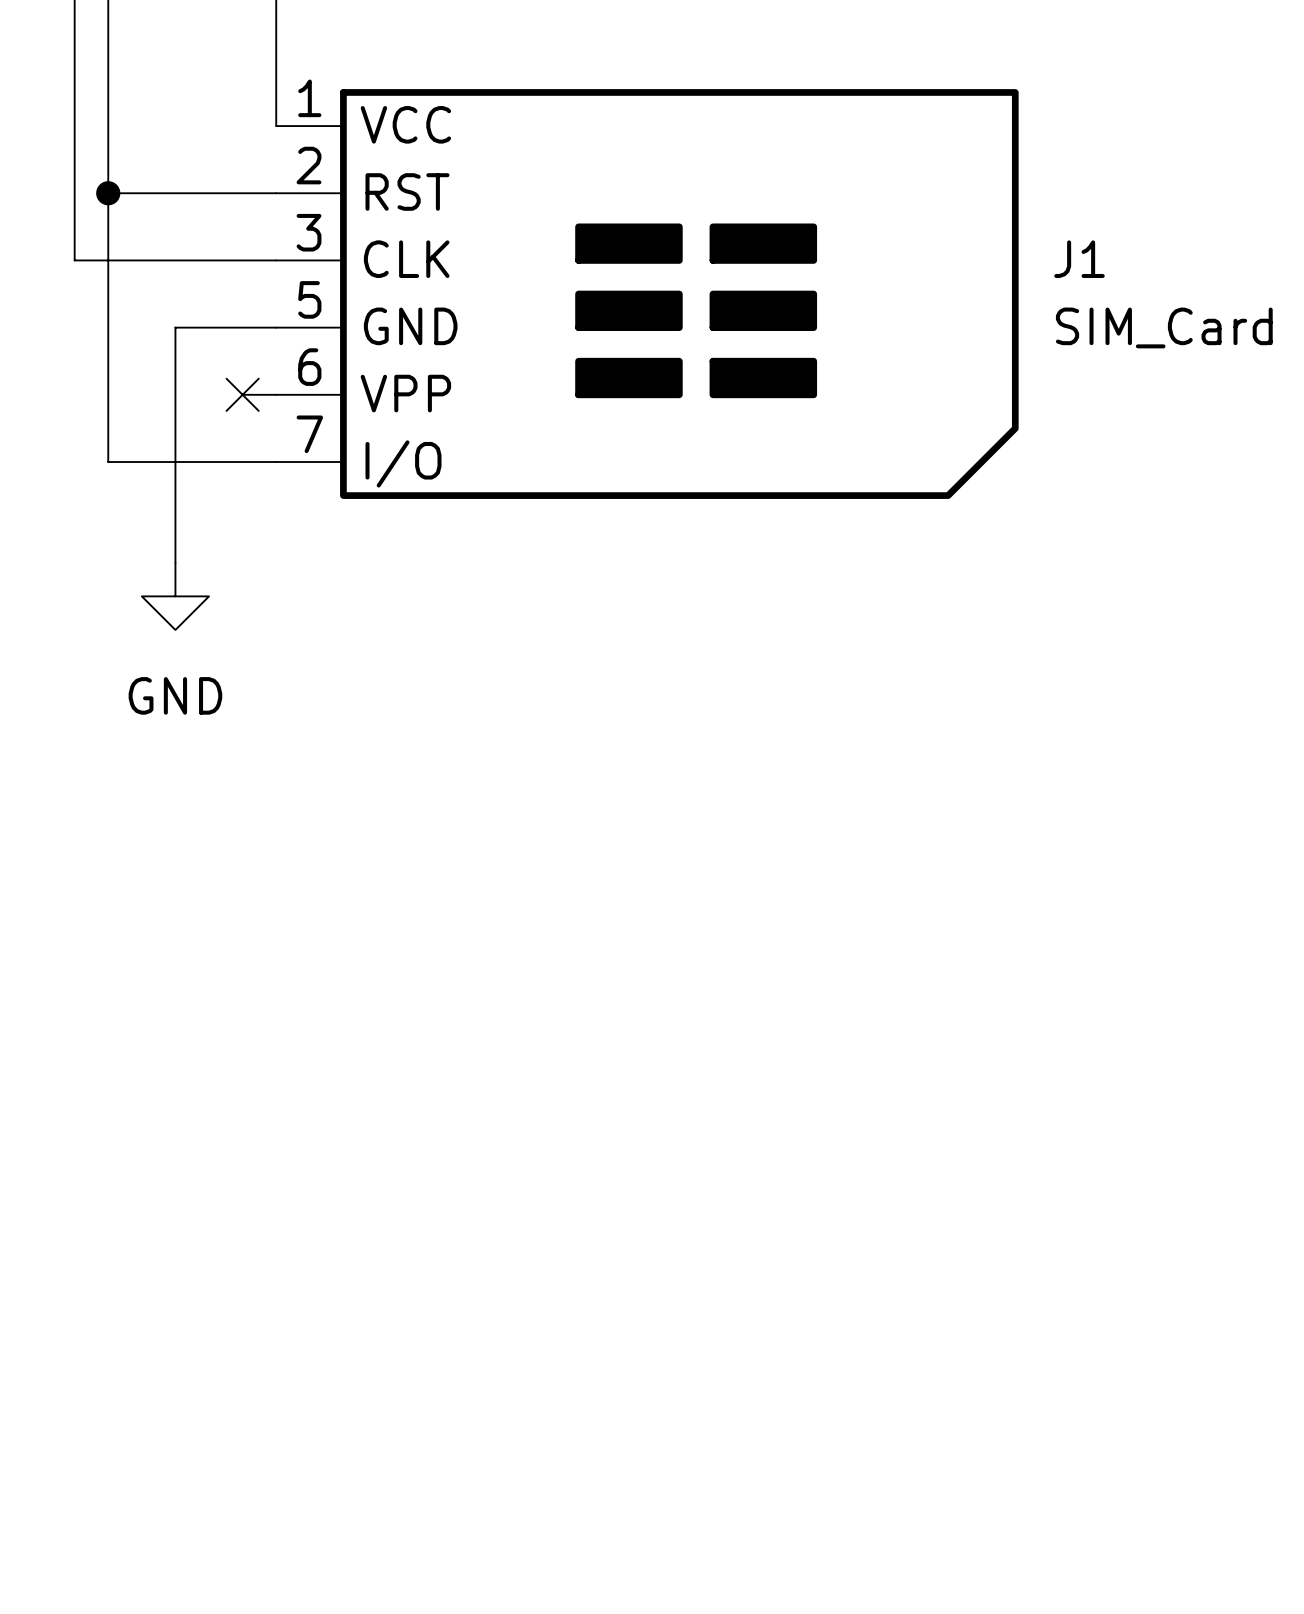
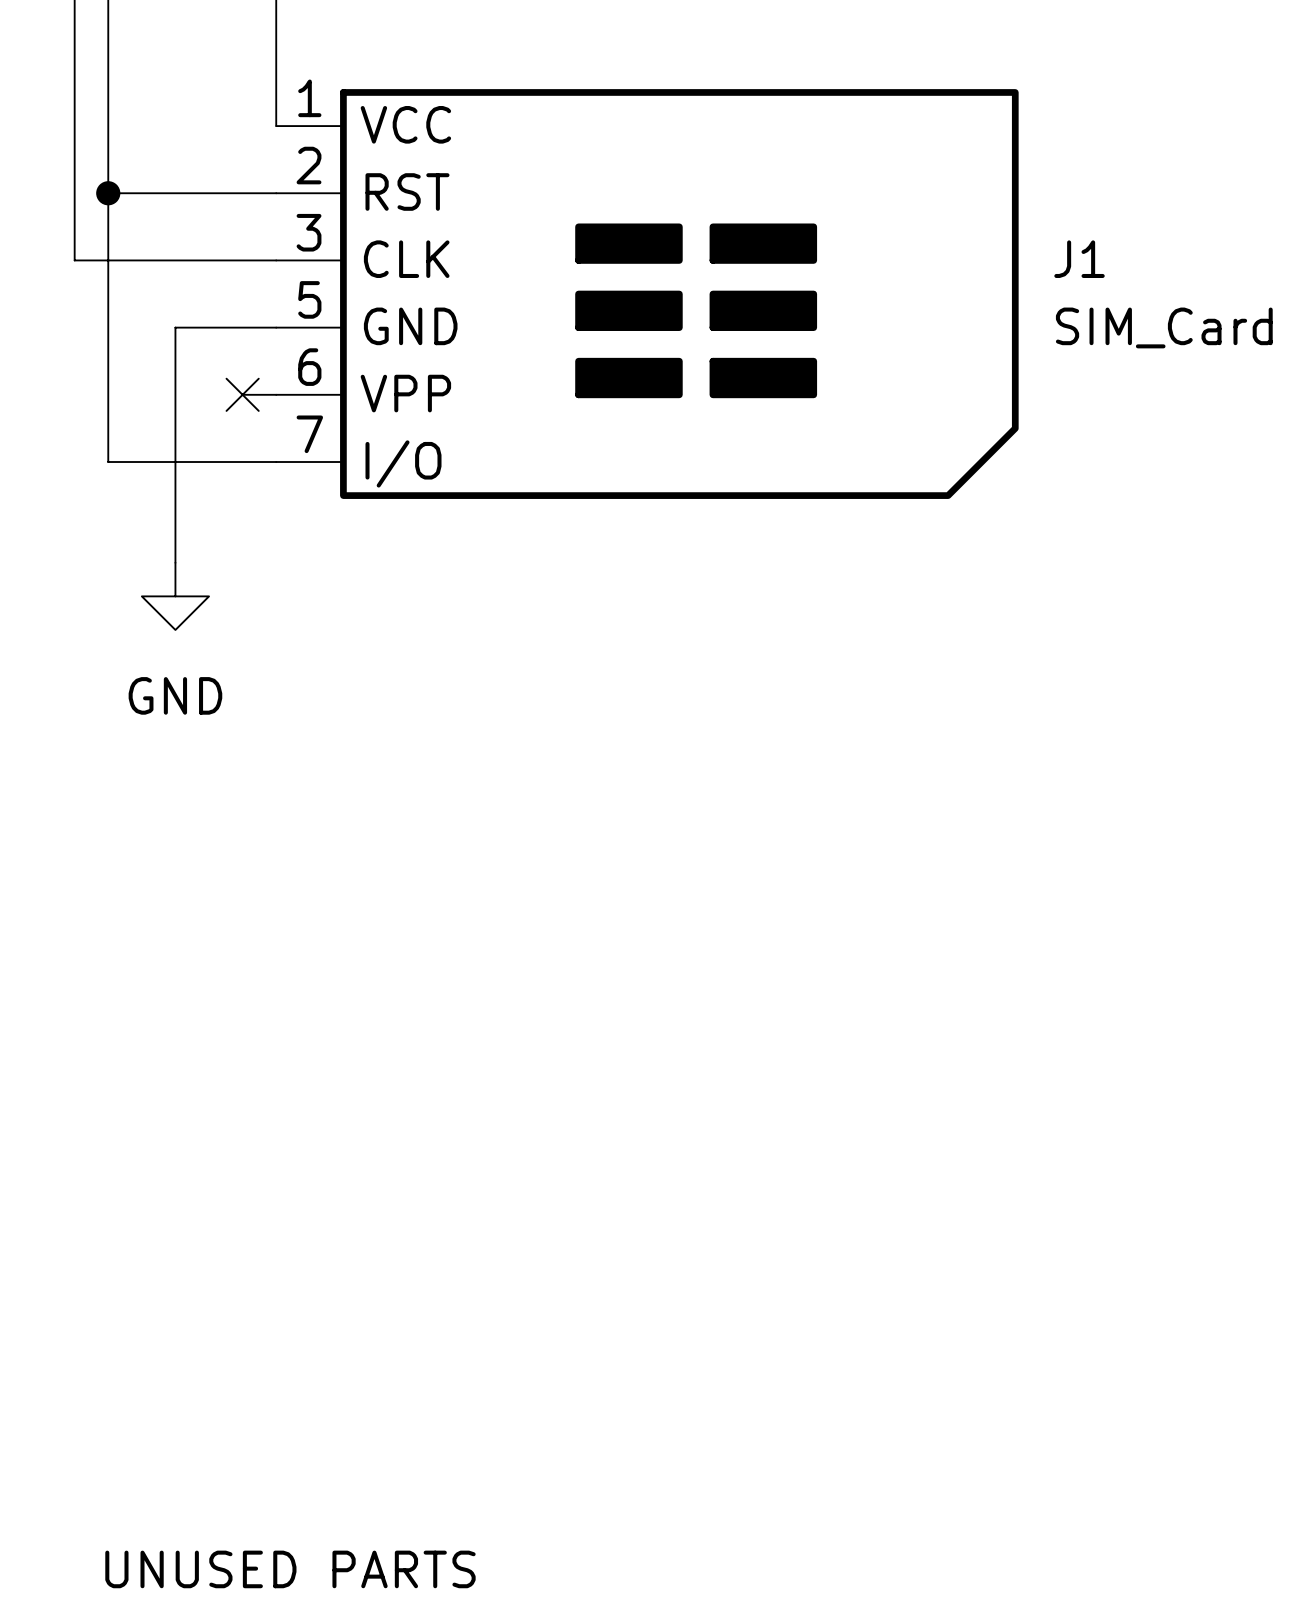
text: none -> UNUSED PARTS (290, 1569)

